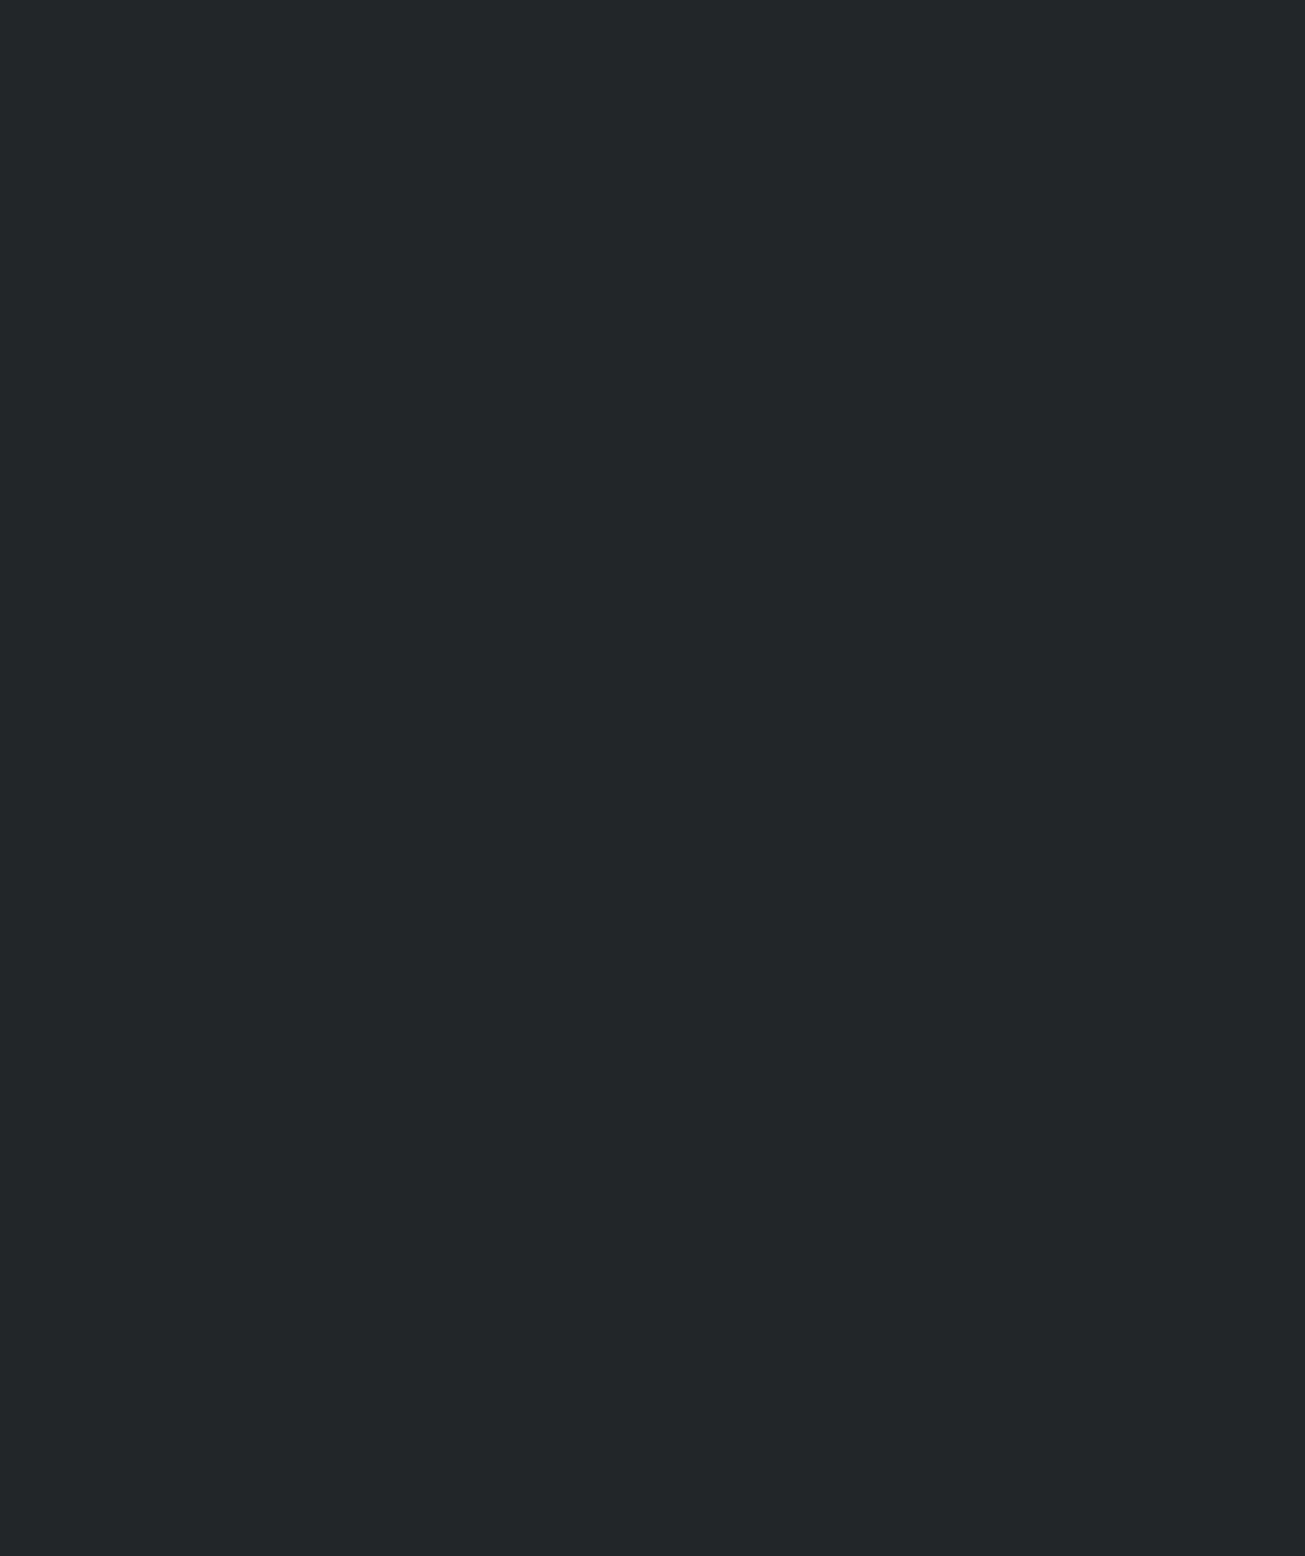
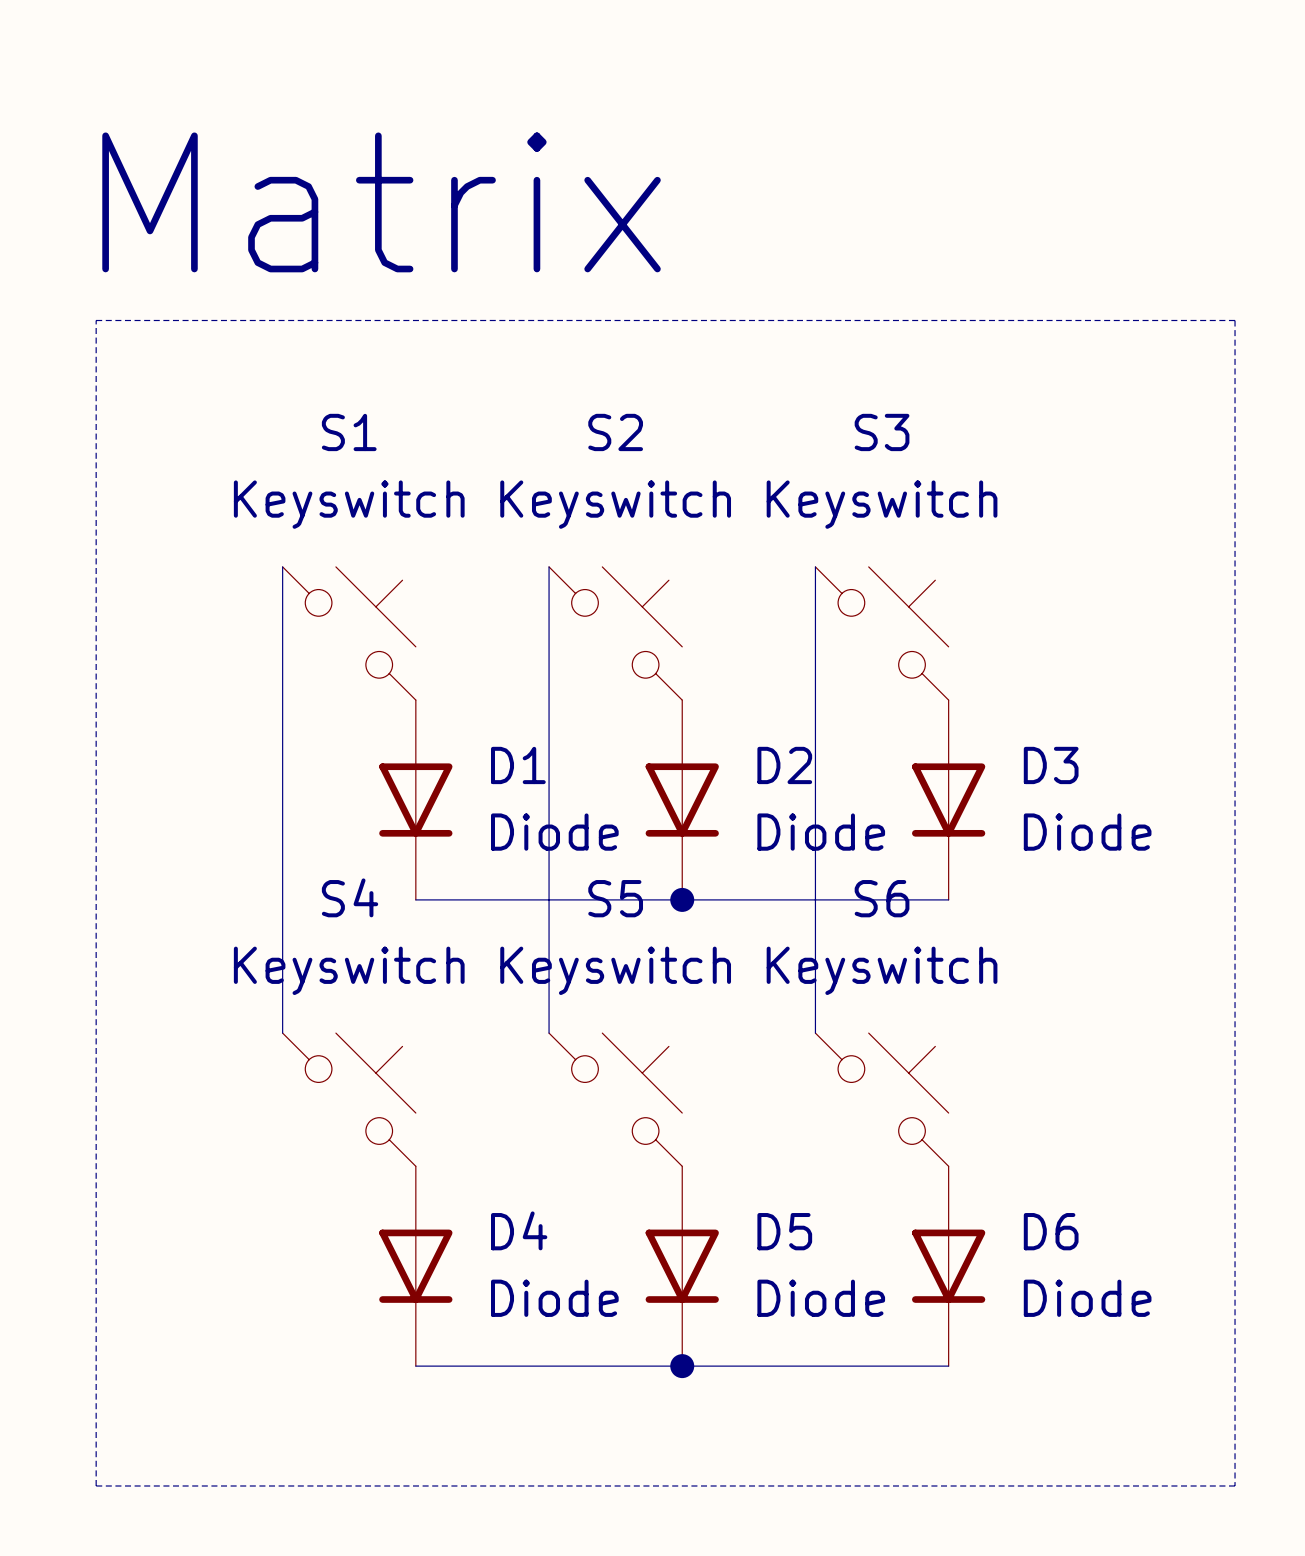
text: none -> Matrix (381, 202)
line: none -> (96, 320) (1235, 320) (1235, 1485) (96, 1485) (96, 320)
wire: none -> (282, 566) (282, 1033)
wire: none -> (549, 566) (549, 1033)
wire: none -> (815, 566) (815, 1033)
S1: none -> Keyswitch (349, 633)
S2: none -> Keyswitch (615, 633)
S3: none -> Keyswitch (882, 633)
D1: none -> Diode (415, 800)
D2: none -> Diode (682, 800)
D3: none -> Diode (948, 800)
wire: none -> (415, 899) (948, 899)
junction: none -> (682, 899)
S4: none -> Keyswitch (349, 1099)
S5: none -> Keyswitch (615, 1099)
S6: none -> Keyswitch (882, 1099)
D4: none -> Diode (415, 1266)
D5: none -> Diode (682, 1266)
D6: none -> Diode (948, 1266)
wire: none -> (415, 1366) (948, 1366)
junction: none -> (682, 1366)

